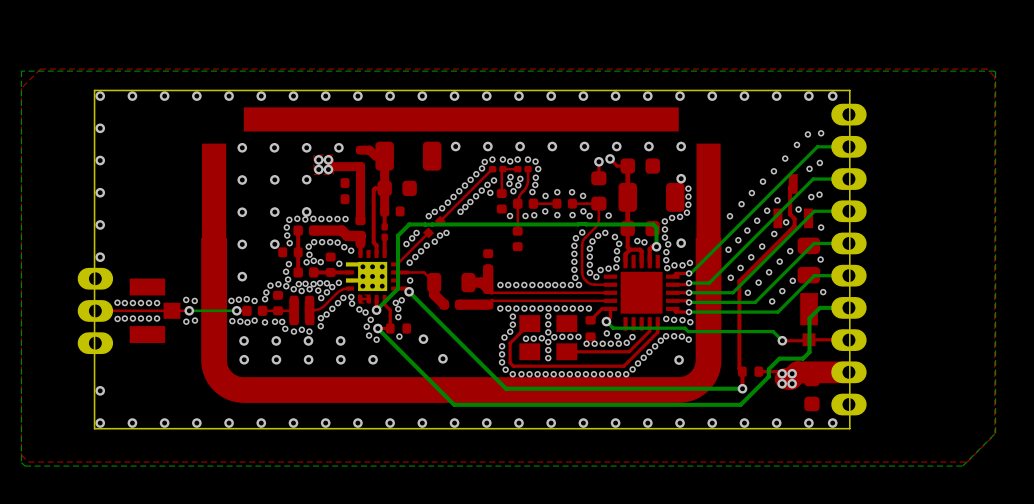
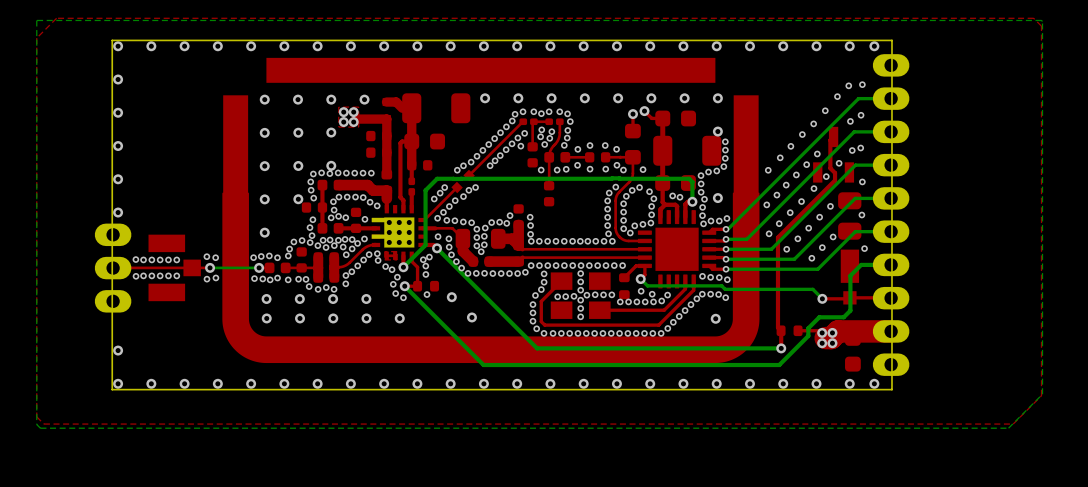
via: none -> (510, 215)
via: none -> (530, 217)
via: none -> (446, 220)
via: none -> (454, 220)
via: none -> (463, 221)
via: none -> (491, 222)
via: none -> (499, 222)
via: none -> (471, 222)
via: none -> (506, 223)
via: none -> (530, 225)
via: none -> (485, 228)
via: none -> (476, 229)
via: none -> (530, 234)
via: none -> (484, 236)
via: none -> (476, 237)
via: none -> (448, 238)
via: none -> (484, 244)
via: none -> (476, 245)
via: none -> (449, 247)
via: none -> (481, 251)
via: none -> (451, 254)
via: none -> (456, 261)
via: none -> (461, 268)
via: none -> (525, 272)
via: none -> (468, 273)
via: none -> (476, 273)
via: none -> (484, 273)
via: none -> (492, 273)
via: none -> (501, 273)
via: none -> (509, 273)
via: none -> (517, 273)

